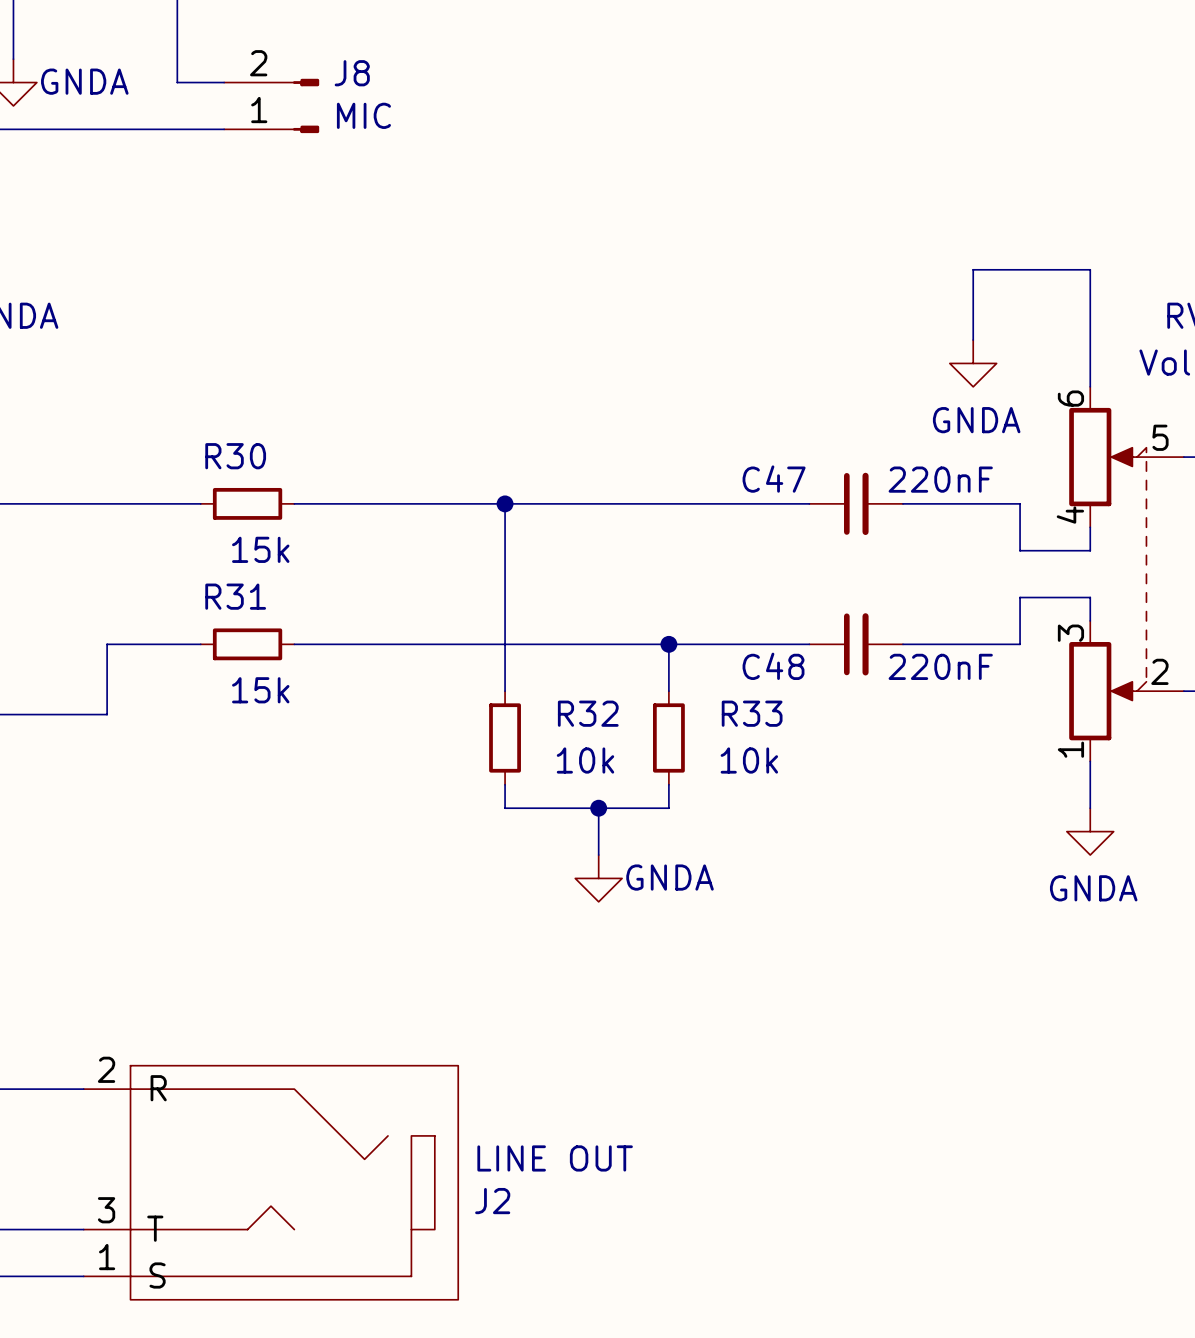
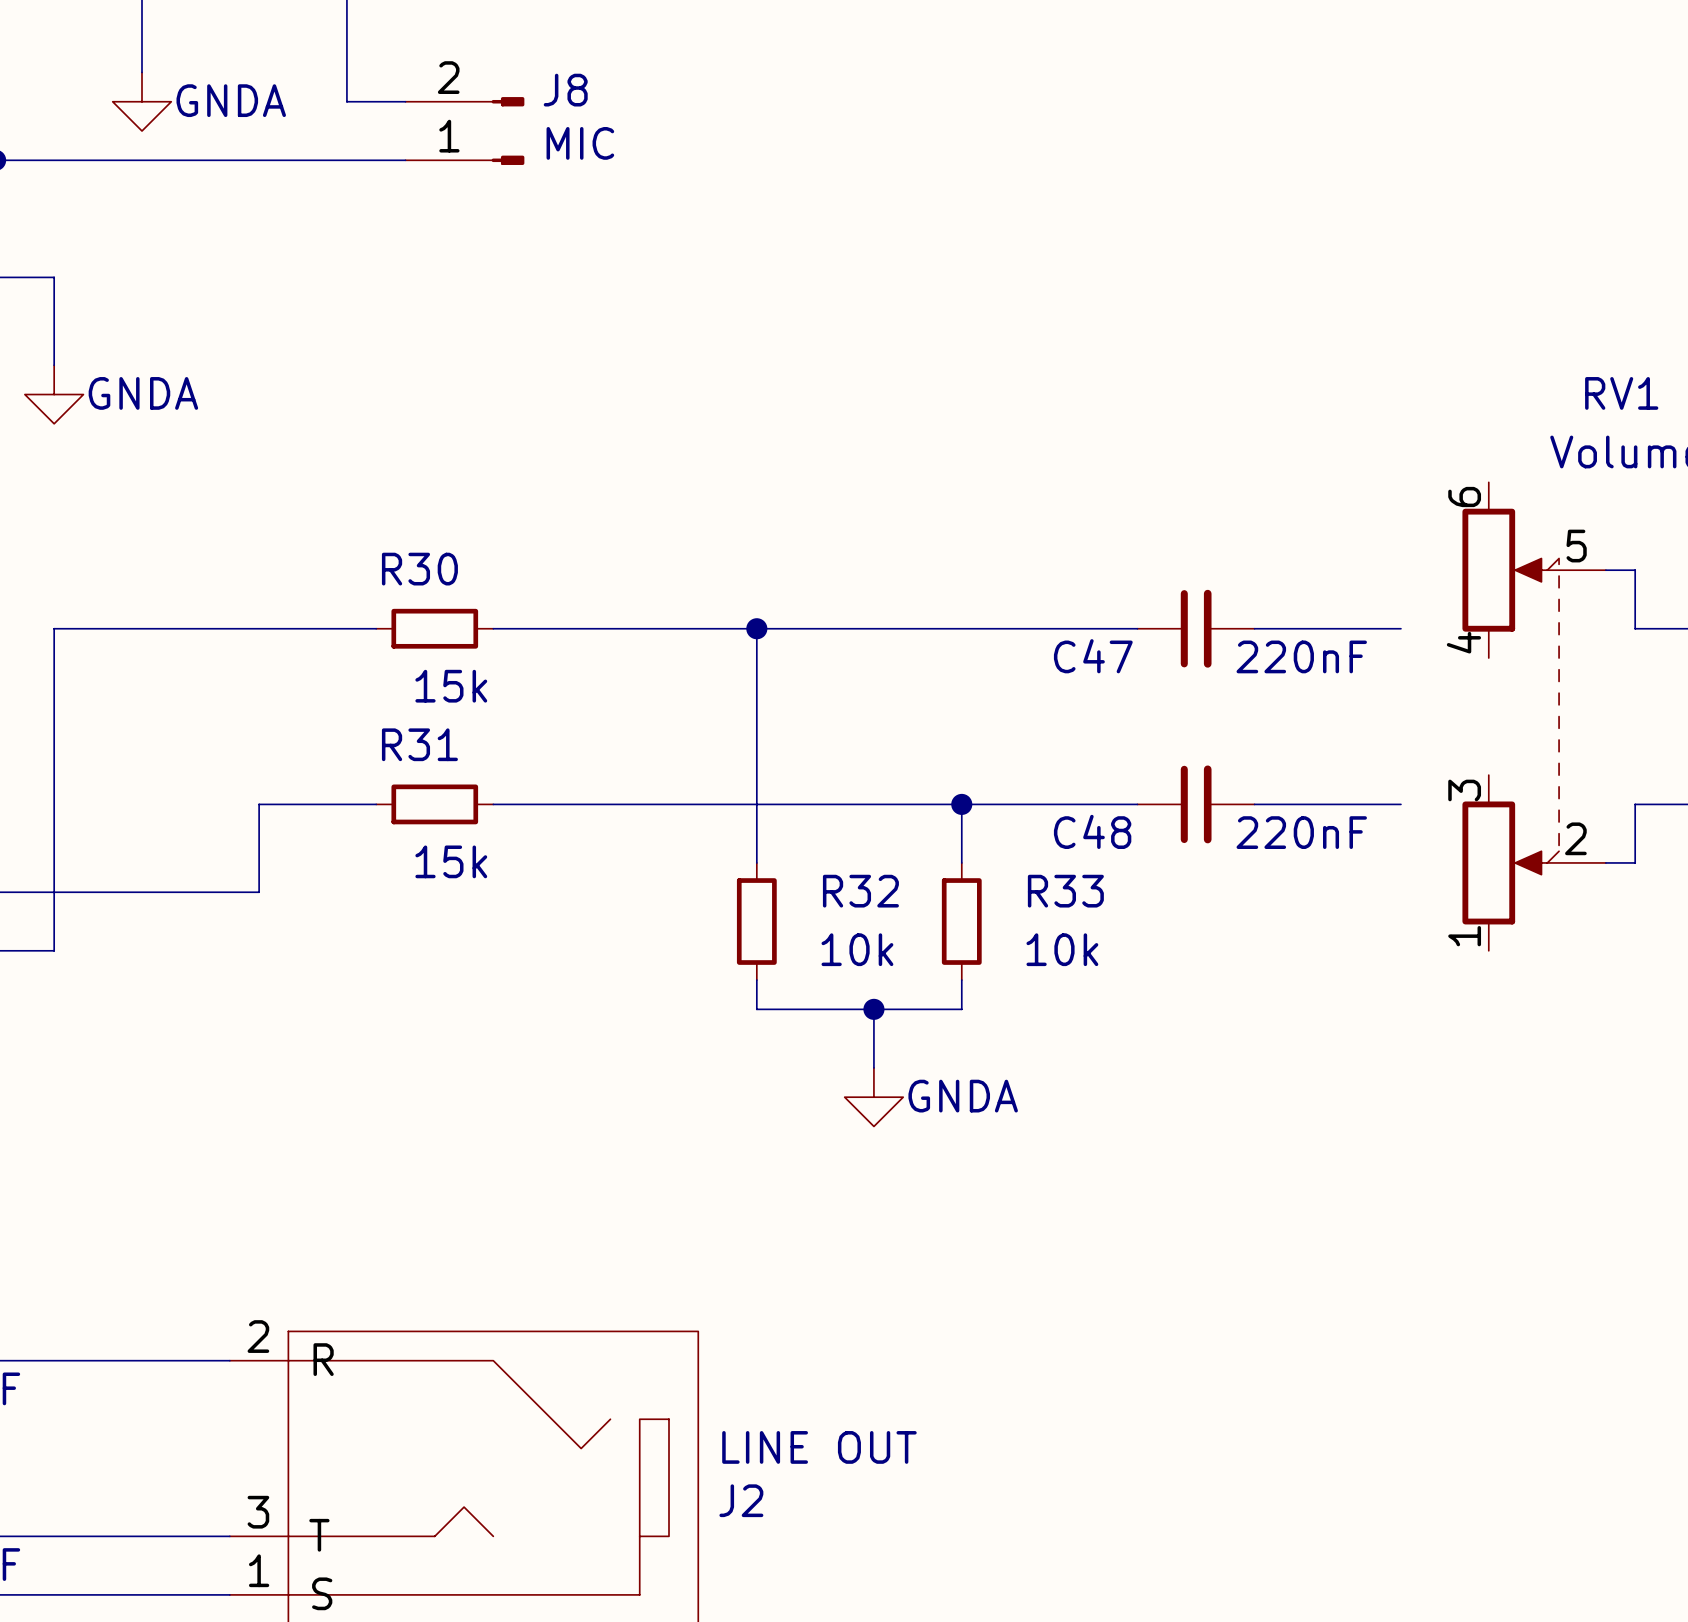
wire: (973, 340) (973, 269) (1090, 269) (1090, 386) -> none
power symbol: GNDA (973, 363) -> none
C47 name position: C47 (774, 479) -> C47 (1093, 656)
C47 value position: 220nF (940, 479) -> 220nF (1301, 656)
wire: (1020, 503) (1020, 550) (1090, 550) (1090, 527) -> none
wire: (1090, 620) (1090, 597) (1020, 597) (1020, 644) -> none
wire: (1090, 761) (1090, 808) -> none
power symbol: GNDA (1090, 831) -> none

